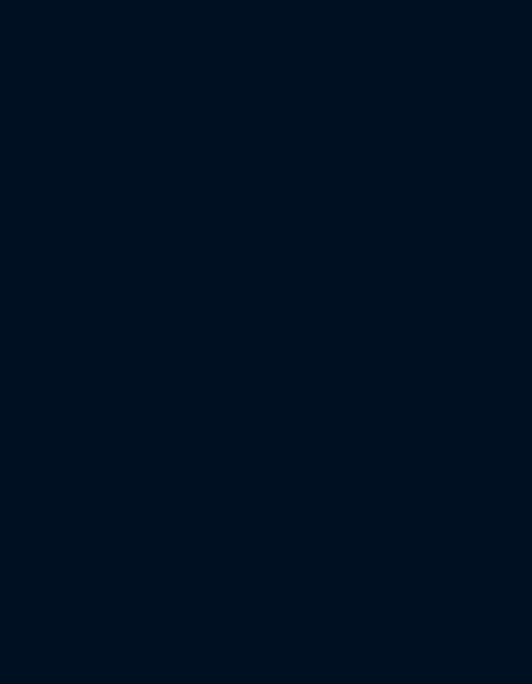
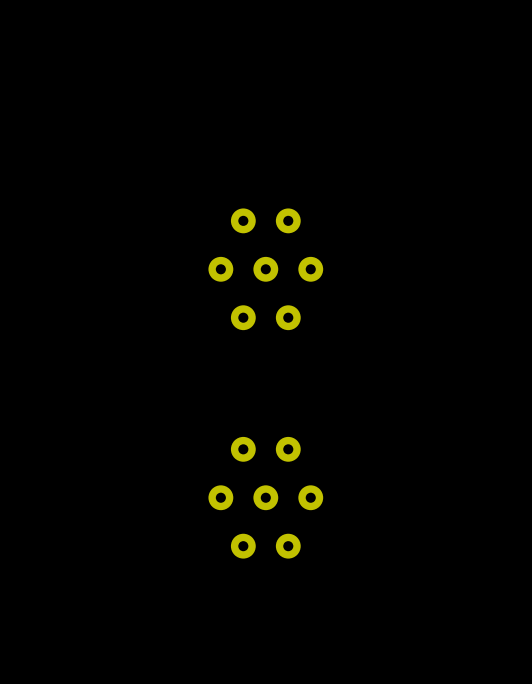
part: none -> (265, 269)
part: none -> (265, 497)

